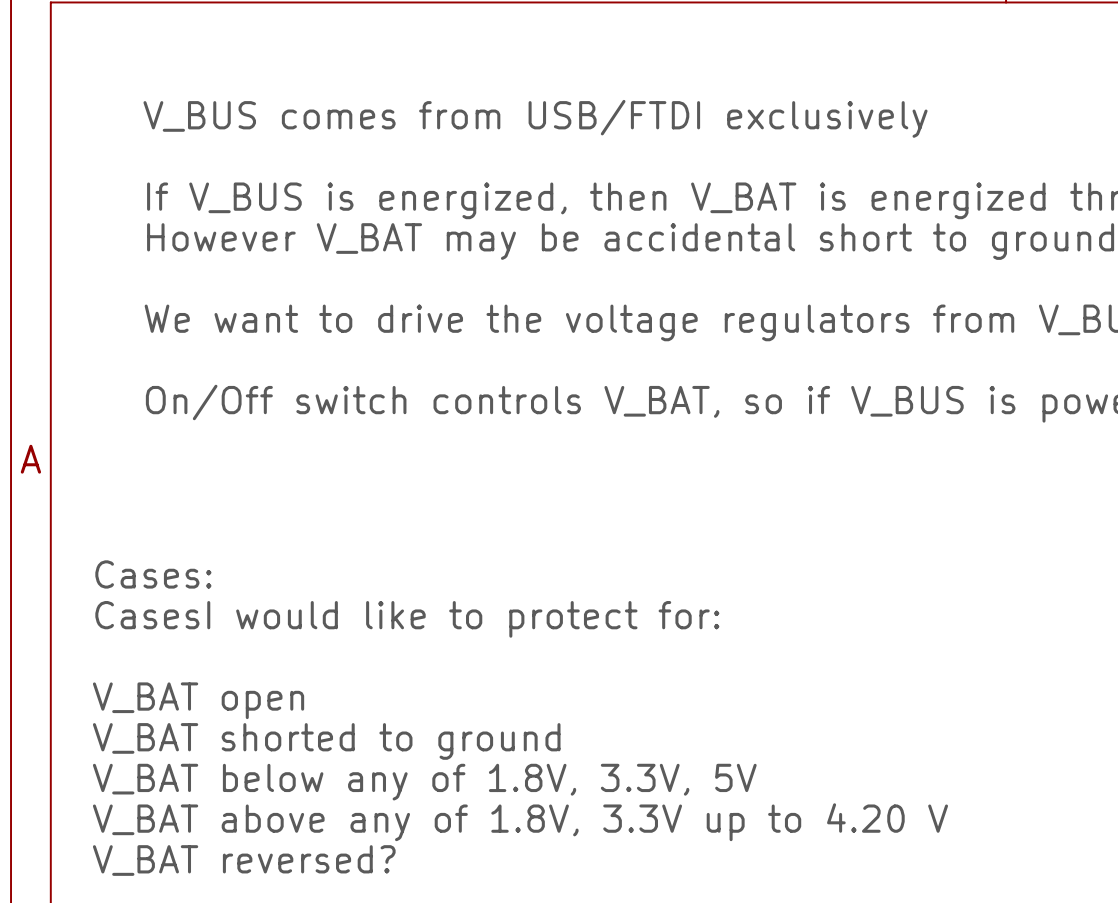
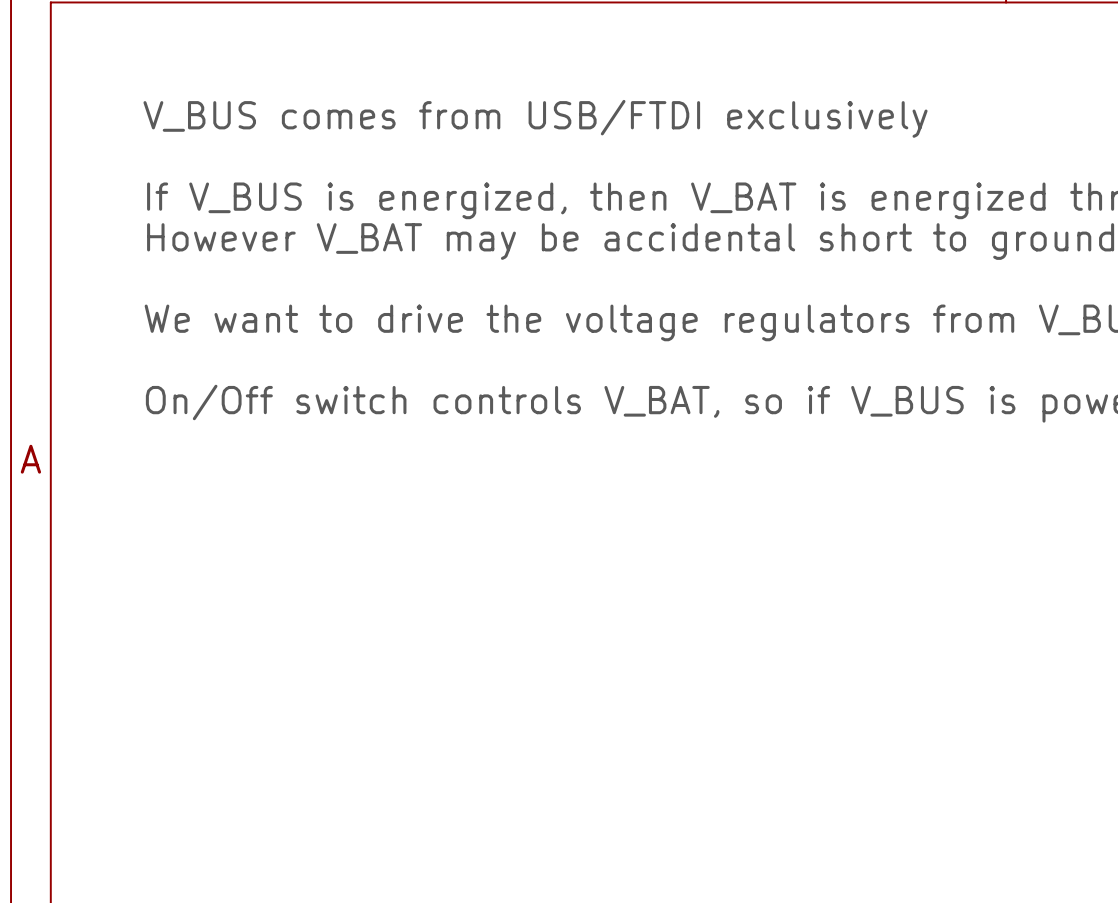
text: Cases: (153, 574) -> none
text: CasesI would like to protect for: (407, 619) -> none
text: V_BAT open (198, 700) -> none
text: V_BAT shorted to ground (326, 741) -> none
text: V_BAT below any of 1.8V, 3.3V, 5V (424, 782) -> none
text: V_BAT above any of 1.8V, 3.3V up to 4.20 V (520, 822) -> none
text: V_BAT reversed? (244, 860) -> none

